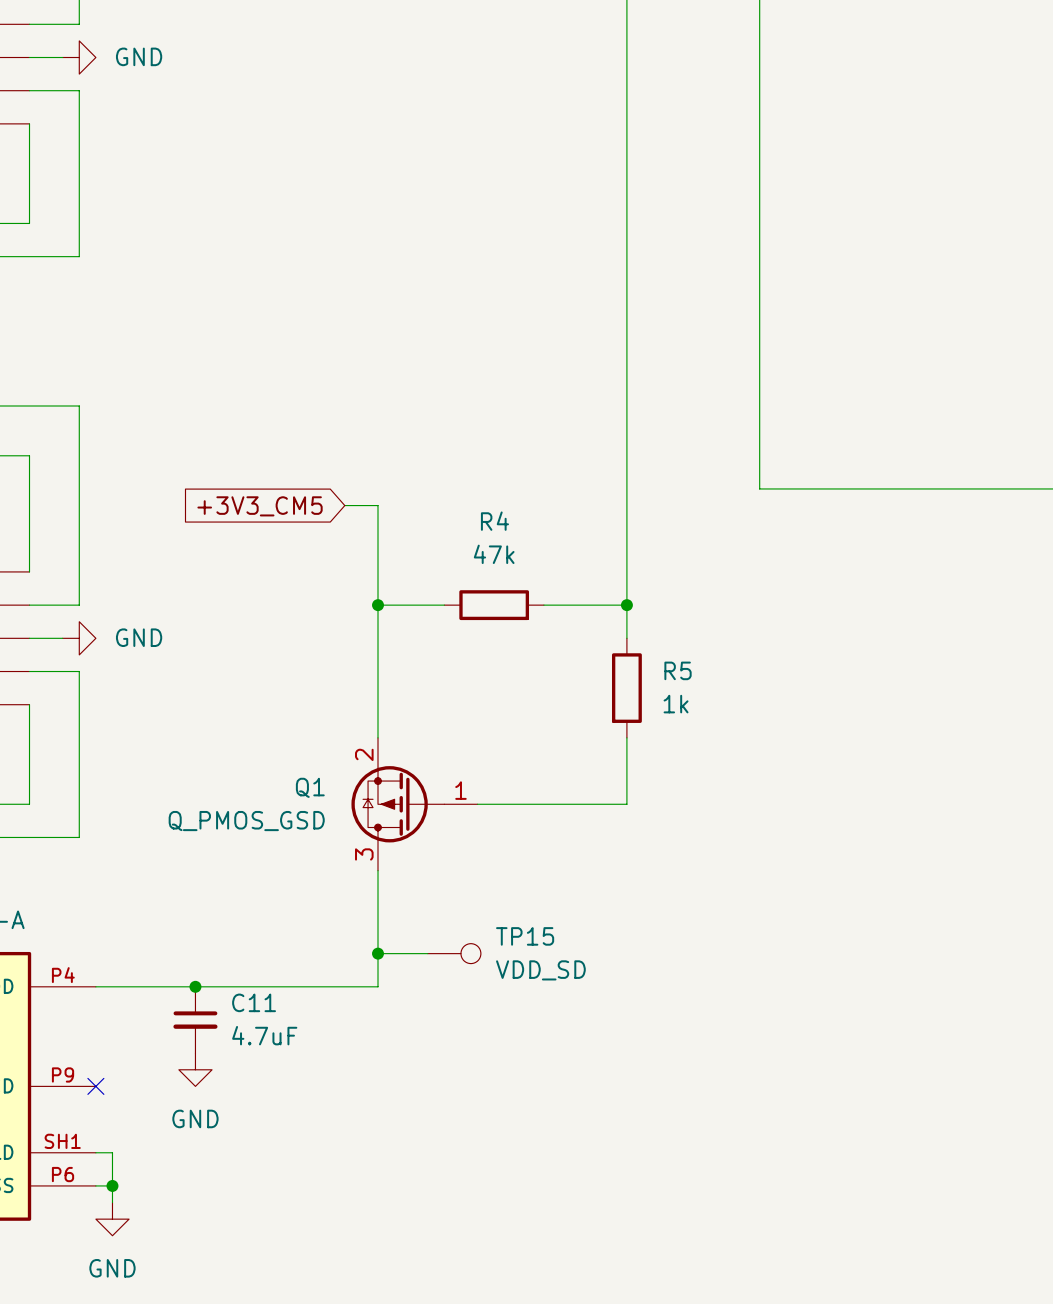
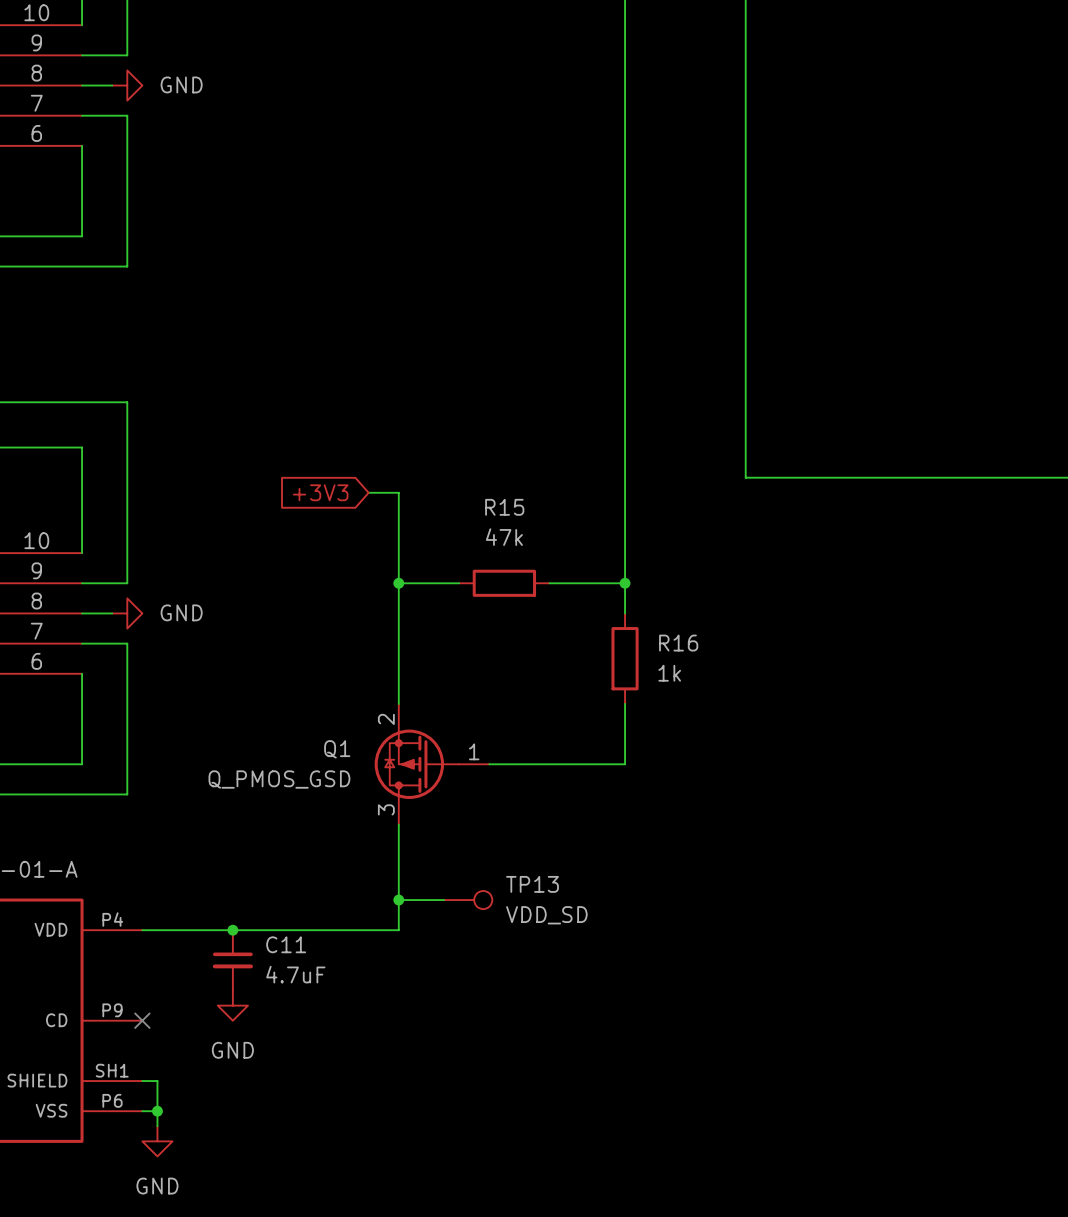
global label: +3V3_CM5 (260, 506) -> +3V3 (320, 492)
R4 name: R4 (494, 521) -> R15 (504, 507)
R5 name: R5 (678, 670) -> R16 (678, 643)
TP15 name: TP15 (525, 936) -> TP13 (532, 884)

